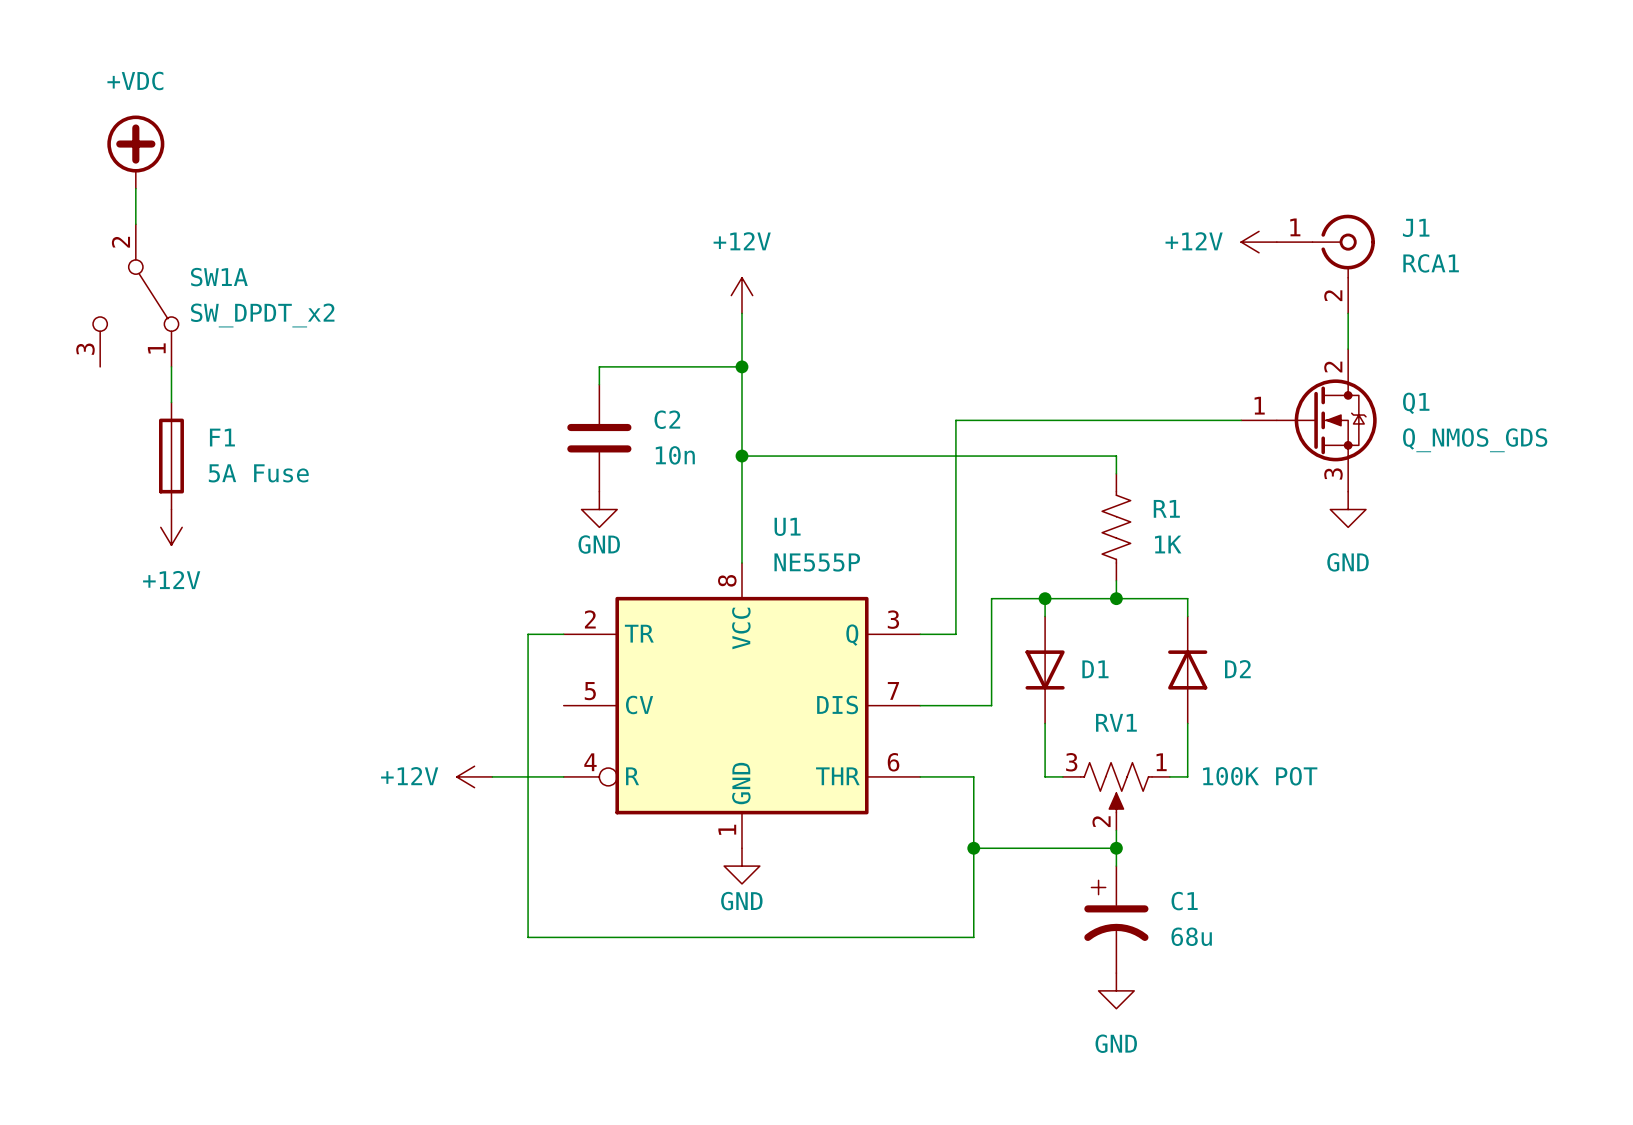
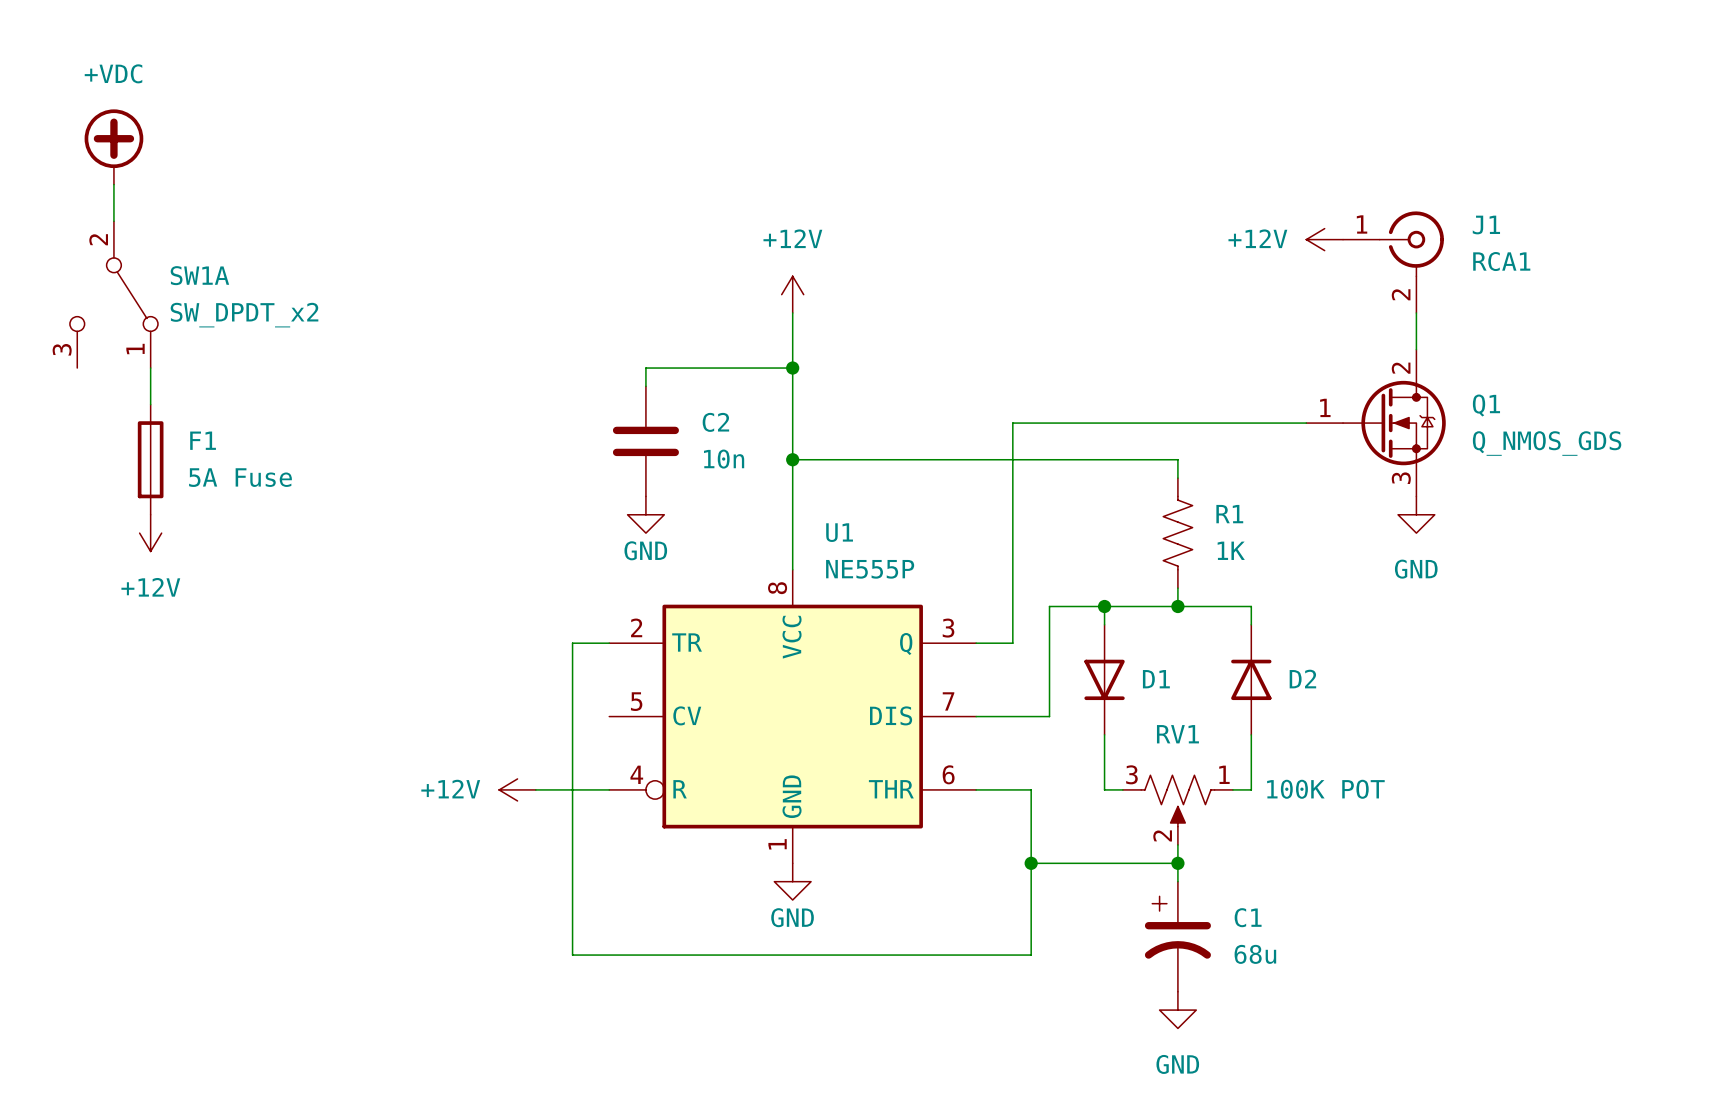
power symbol position: +VDC (135, 152) -> +VDC (113, 146)
wire: (135, 188) (135, 224) -> (113, 184) (113, 221)
SW1A position: (135, 295) -> (113, 294)
wire: (171, 366) (171, 402) -> (150, 368) (150, 404)
F1 position: (171, 456) -> (150, 459)
power symbol position: +12V (171, 527) -> +12V (150, 533)

